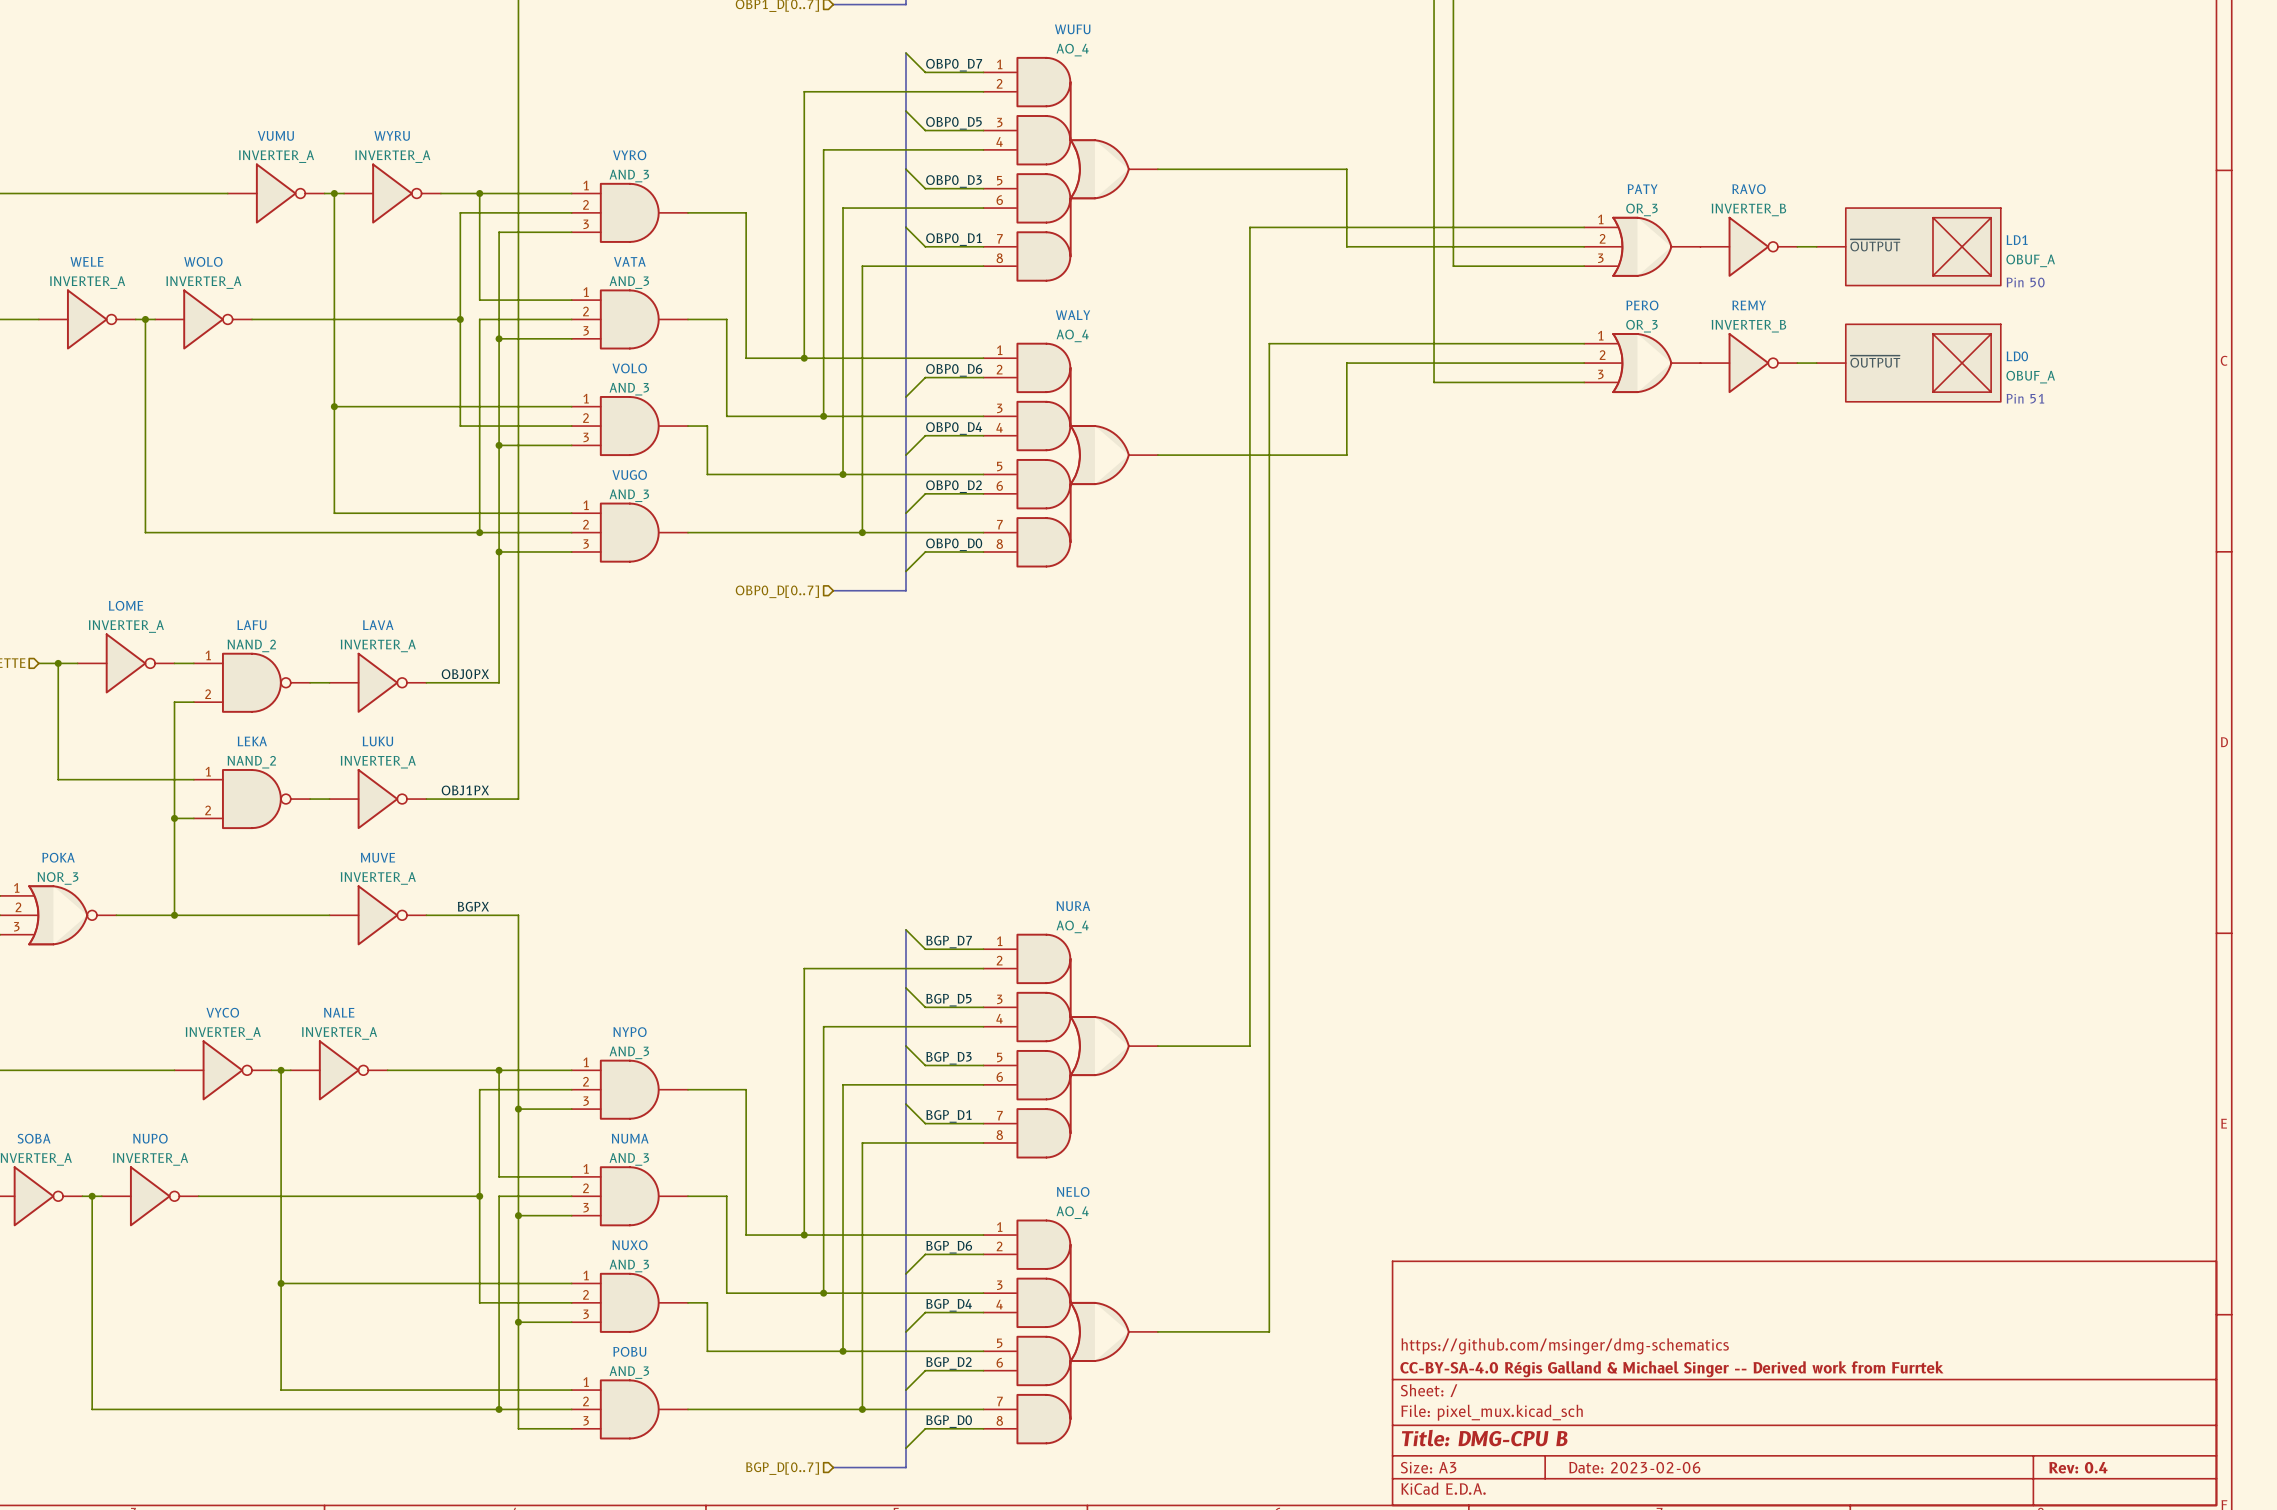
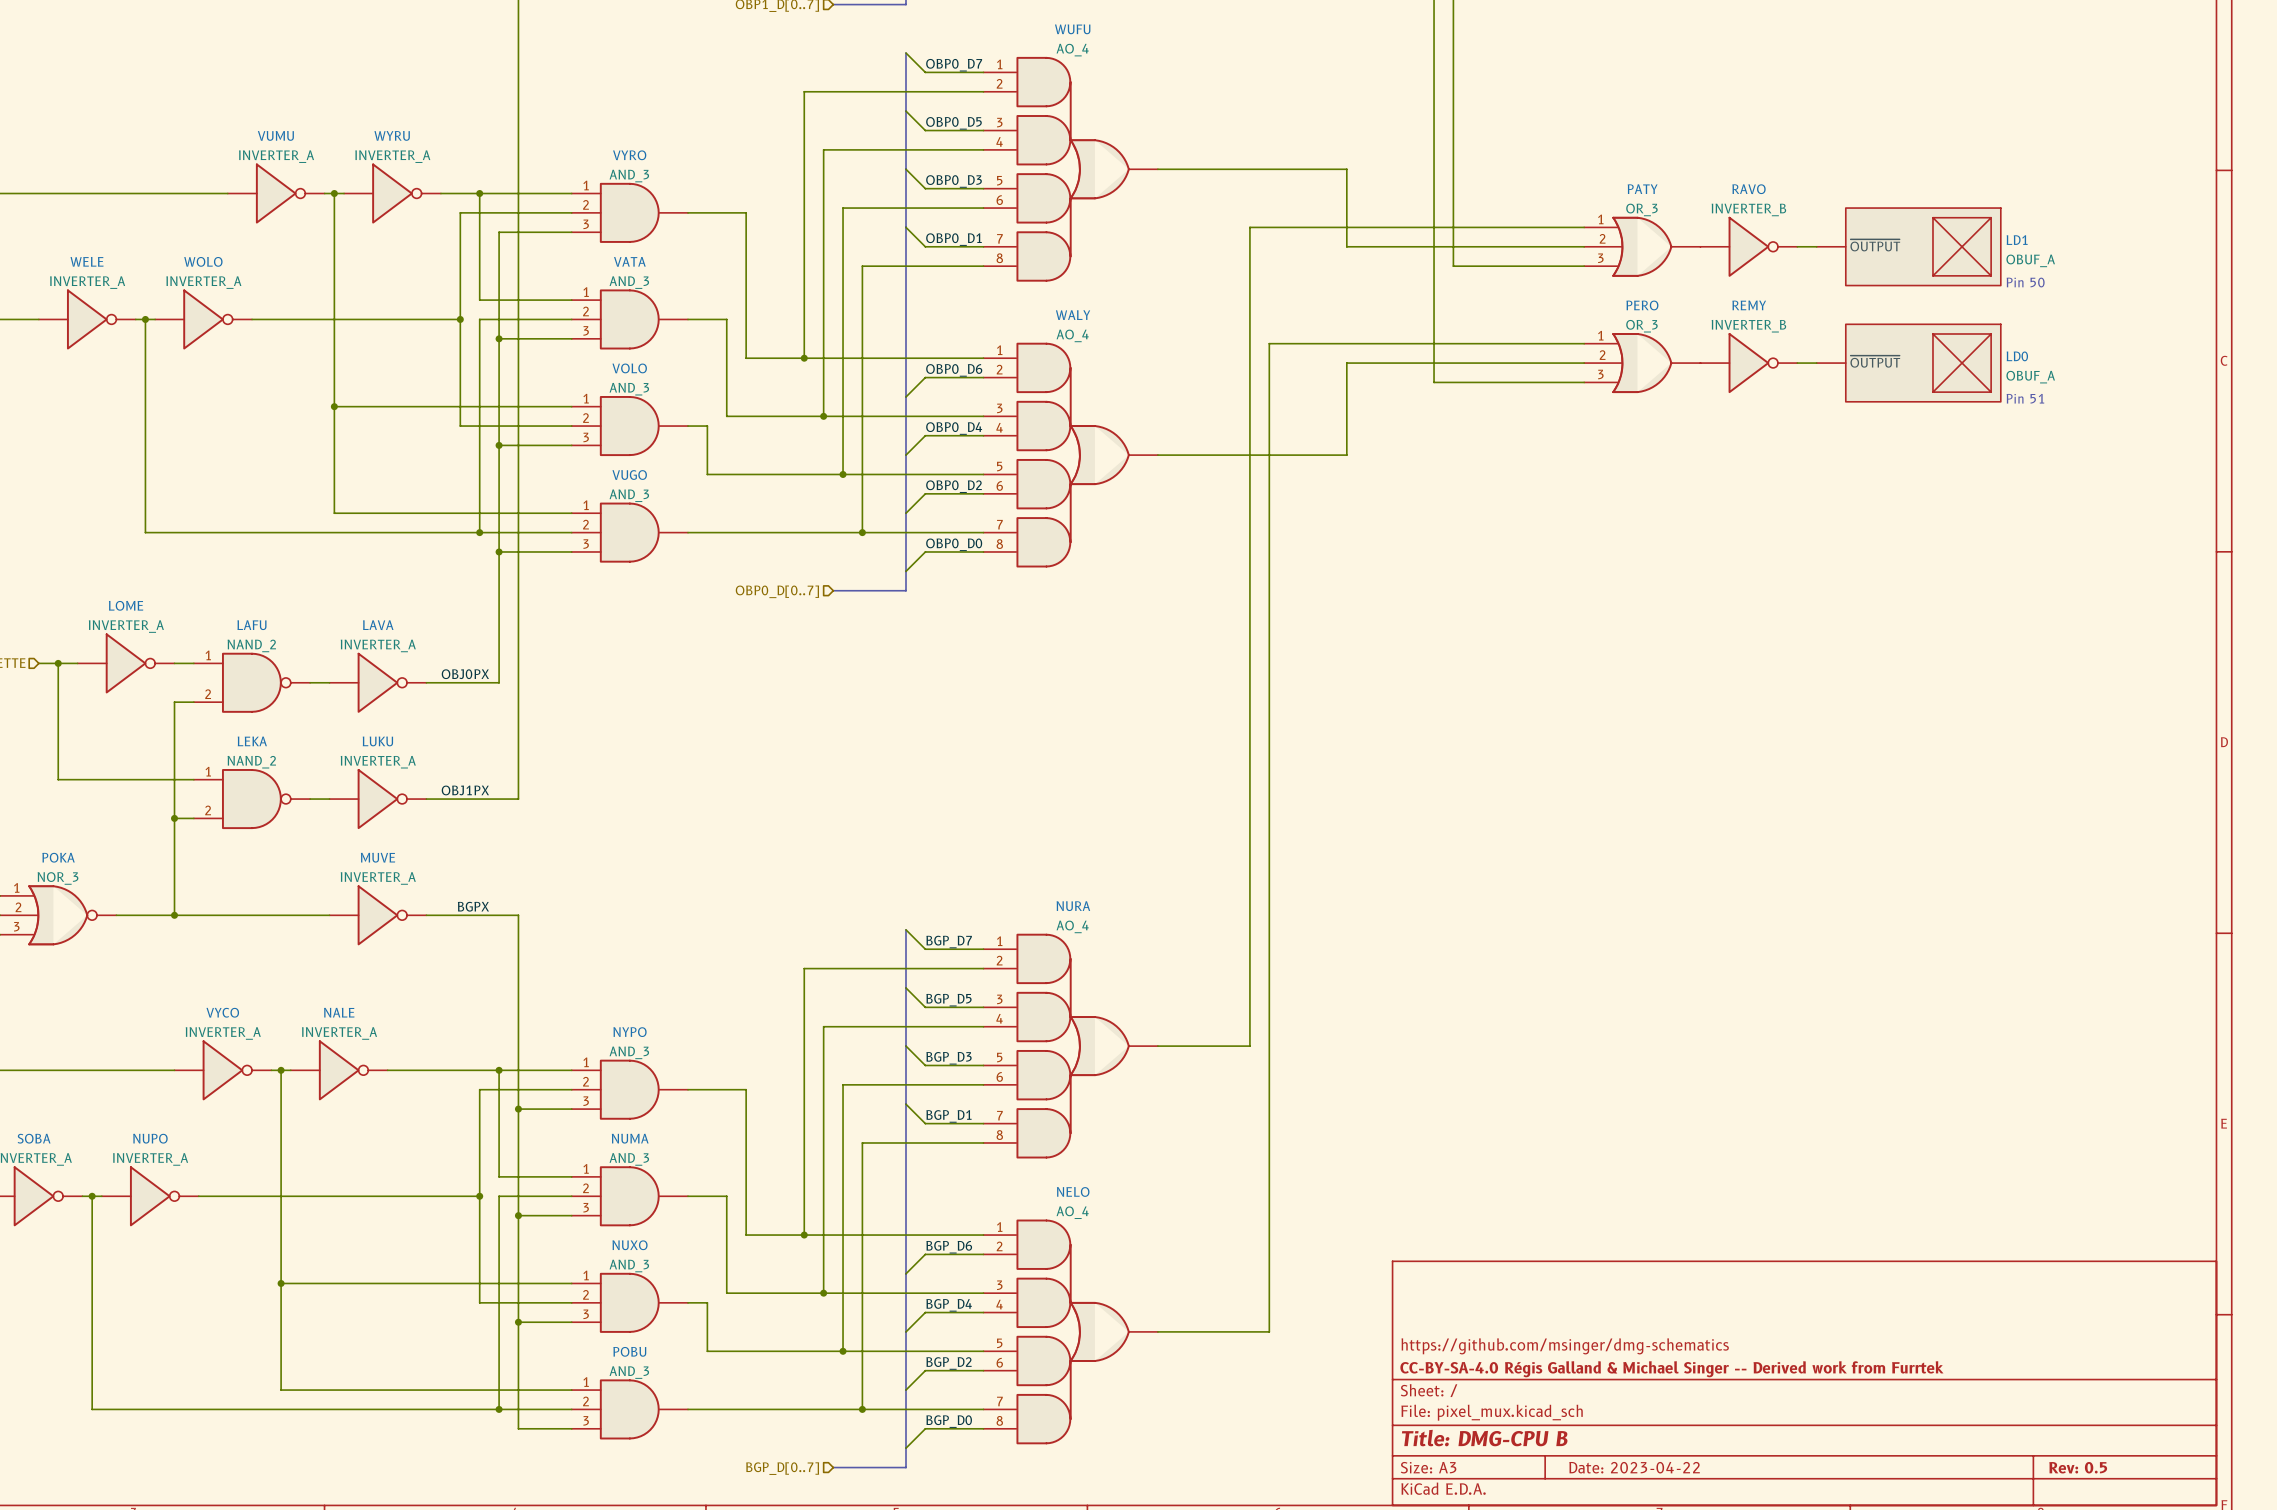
title block: Date: 2023-02-06 (1634, 1467) -> Date: 2023-04-22 (1634, 1467)
title block: Rev: 0.4 (2078, 1467) -> Rev: 0.5 (2078, 1467)

